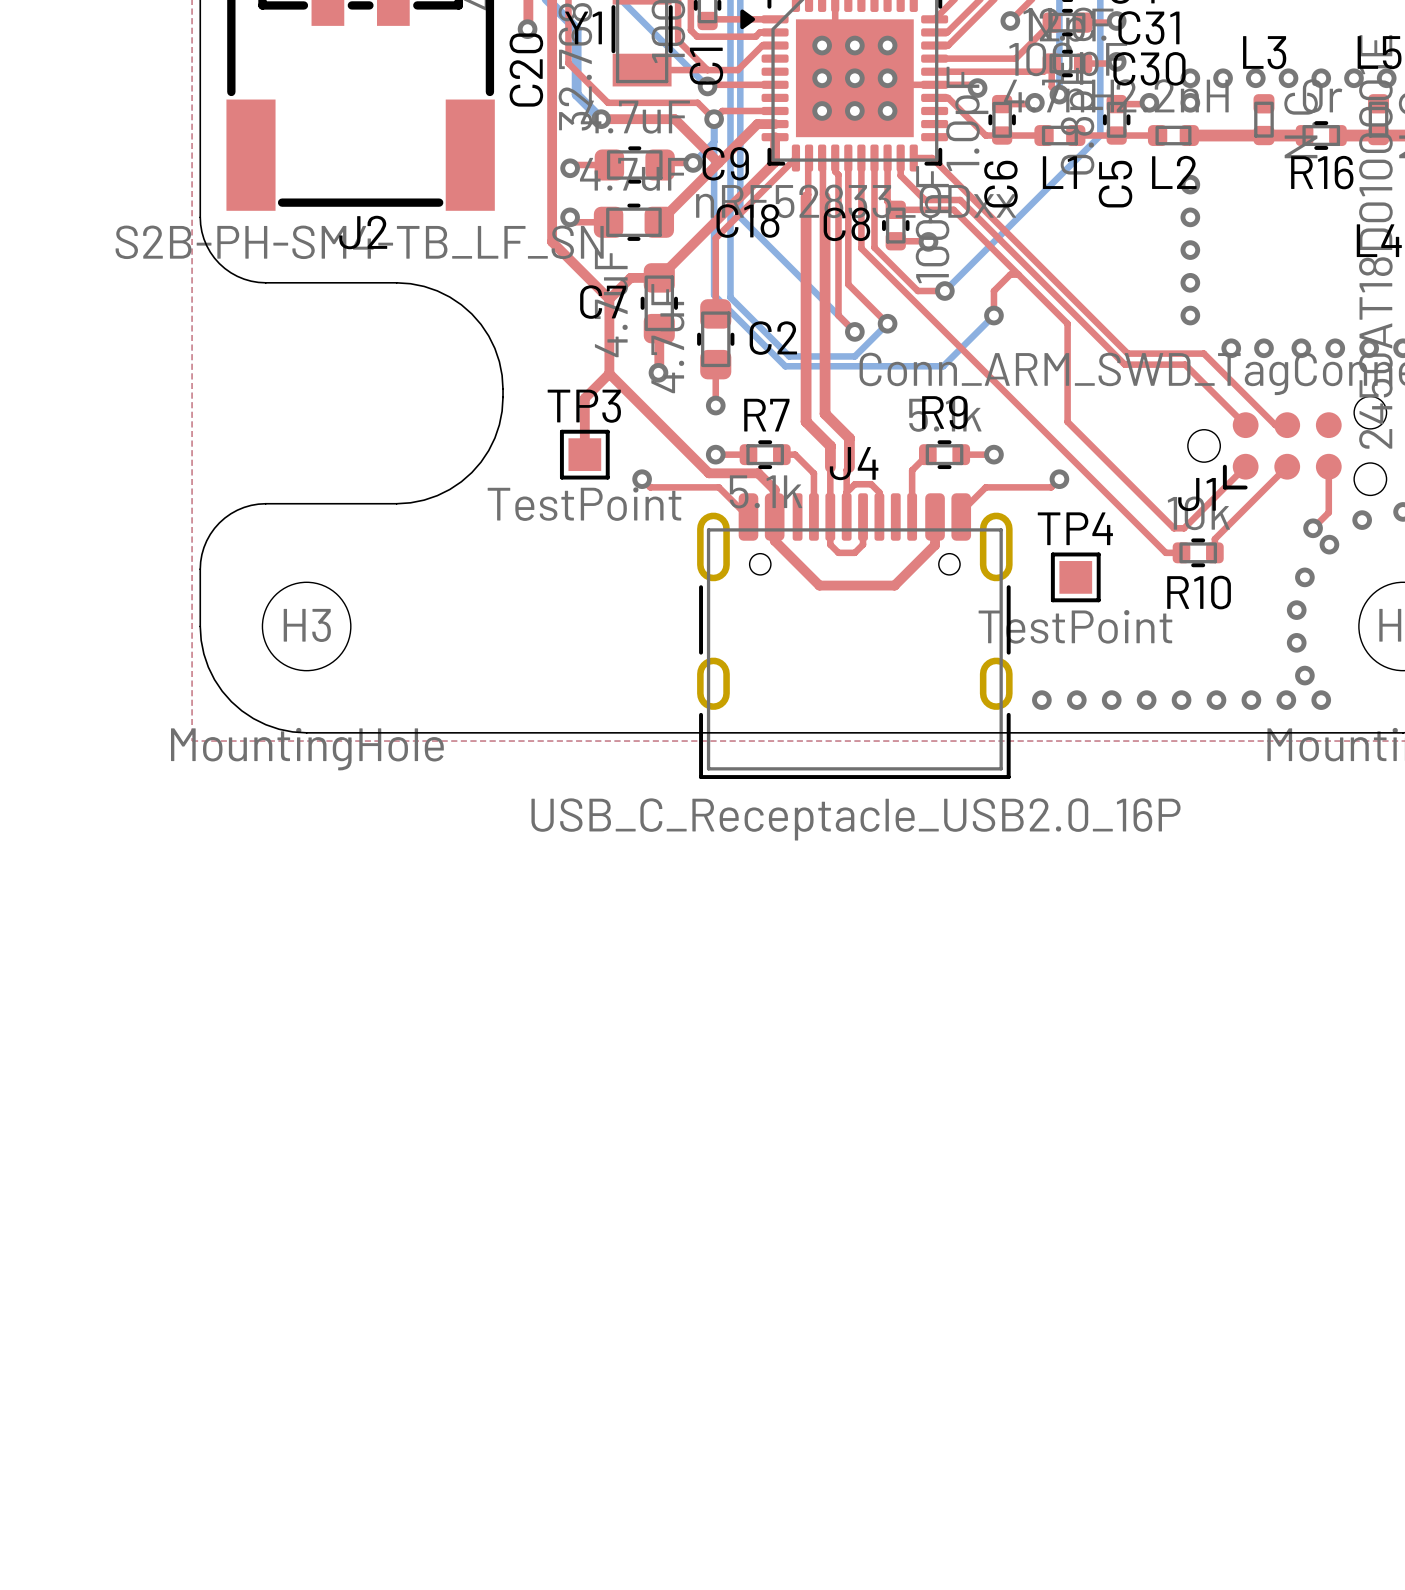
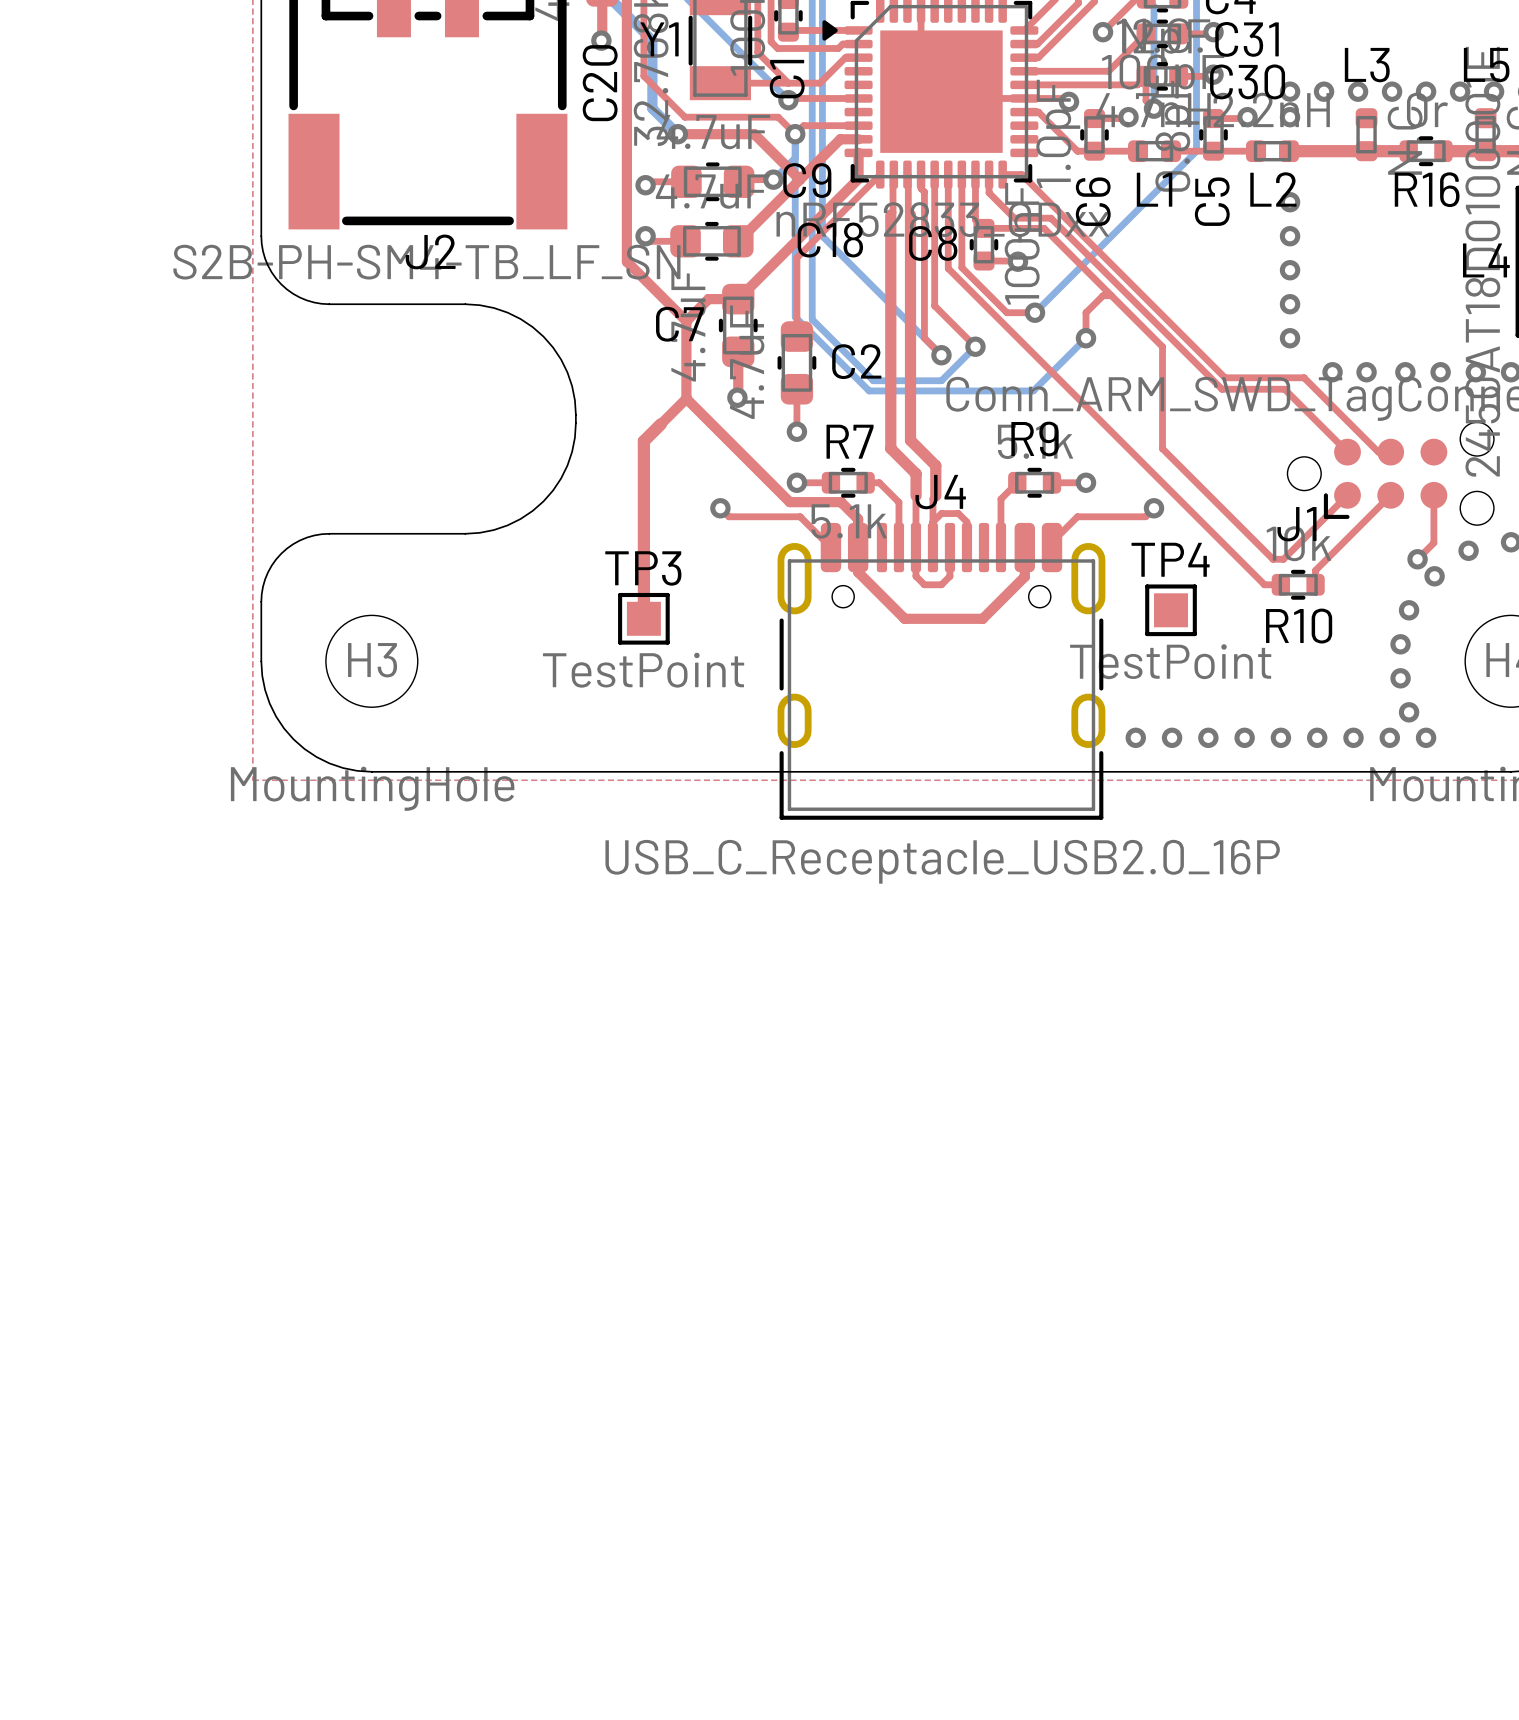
via: (822, 45) -> none
via: (854, 45) -> none
via: (887, 45) -> none
via: (822, 78) -> none
via: (854, 78) -> none
via: (887, 78) -> none
via: (822, 110) -> none
via: (854, 110) -> none
via: (887, 110) -> none
top track: (584, 398) (584, 454) -> (660, 424) (643, 441) (643, 618)
TP3 position: (584, 454) -> (643, 618)

